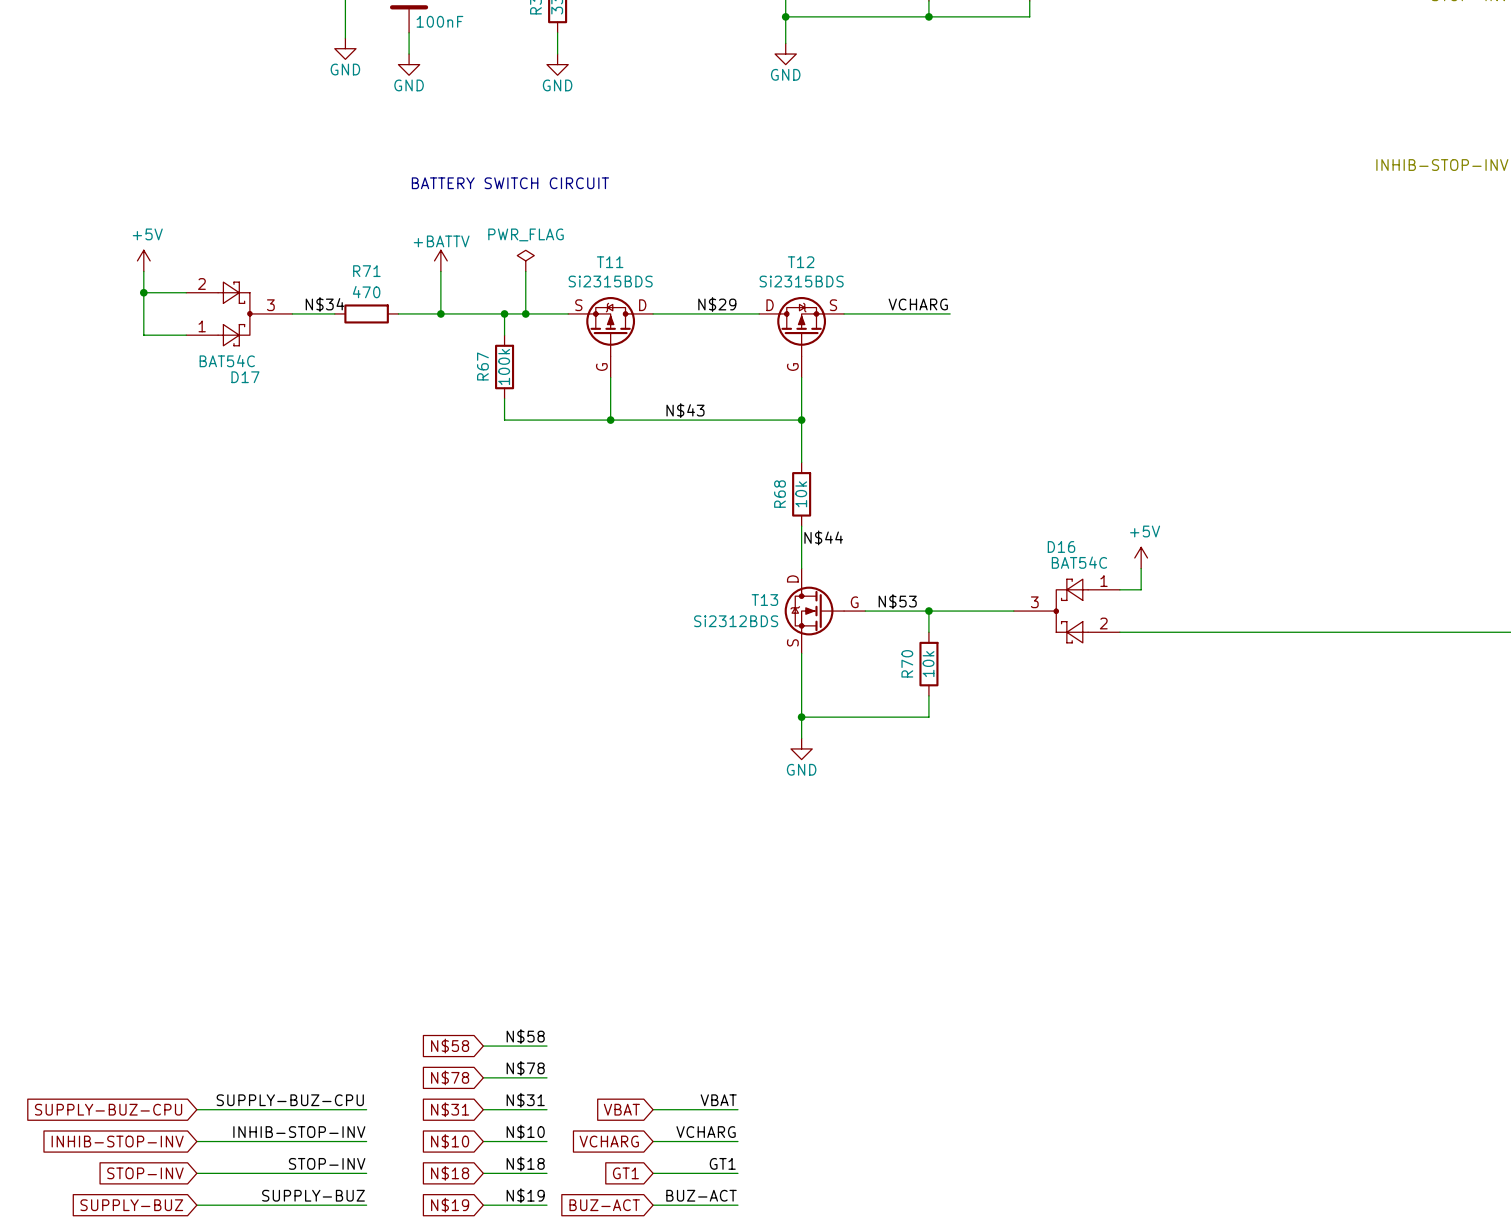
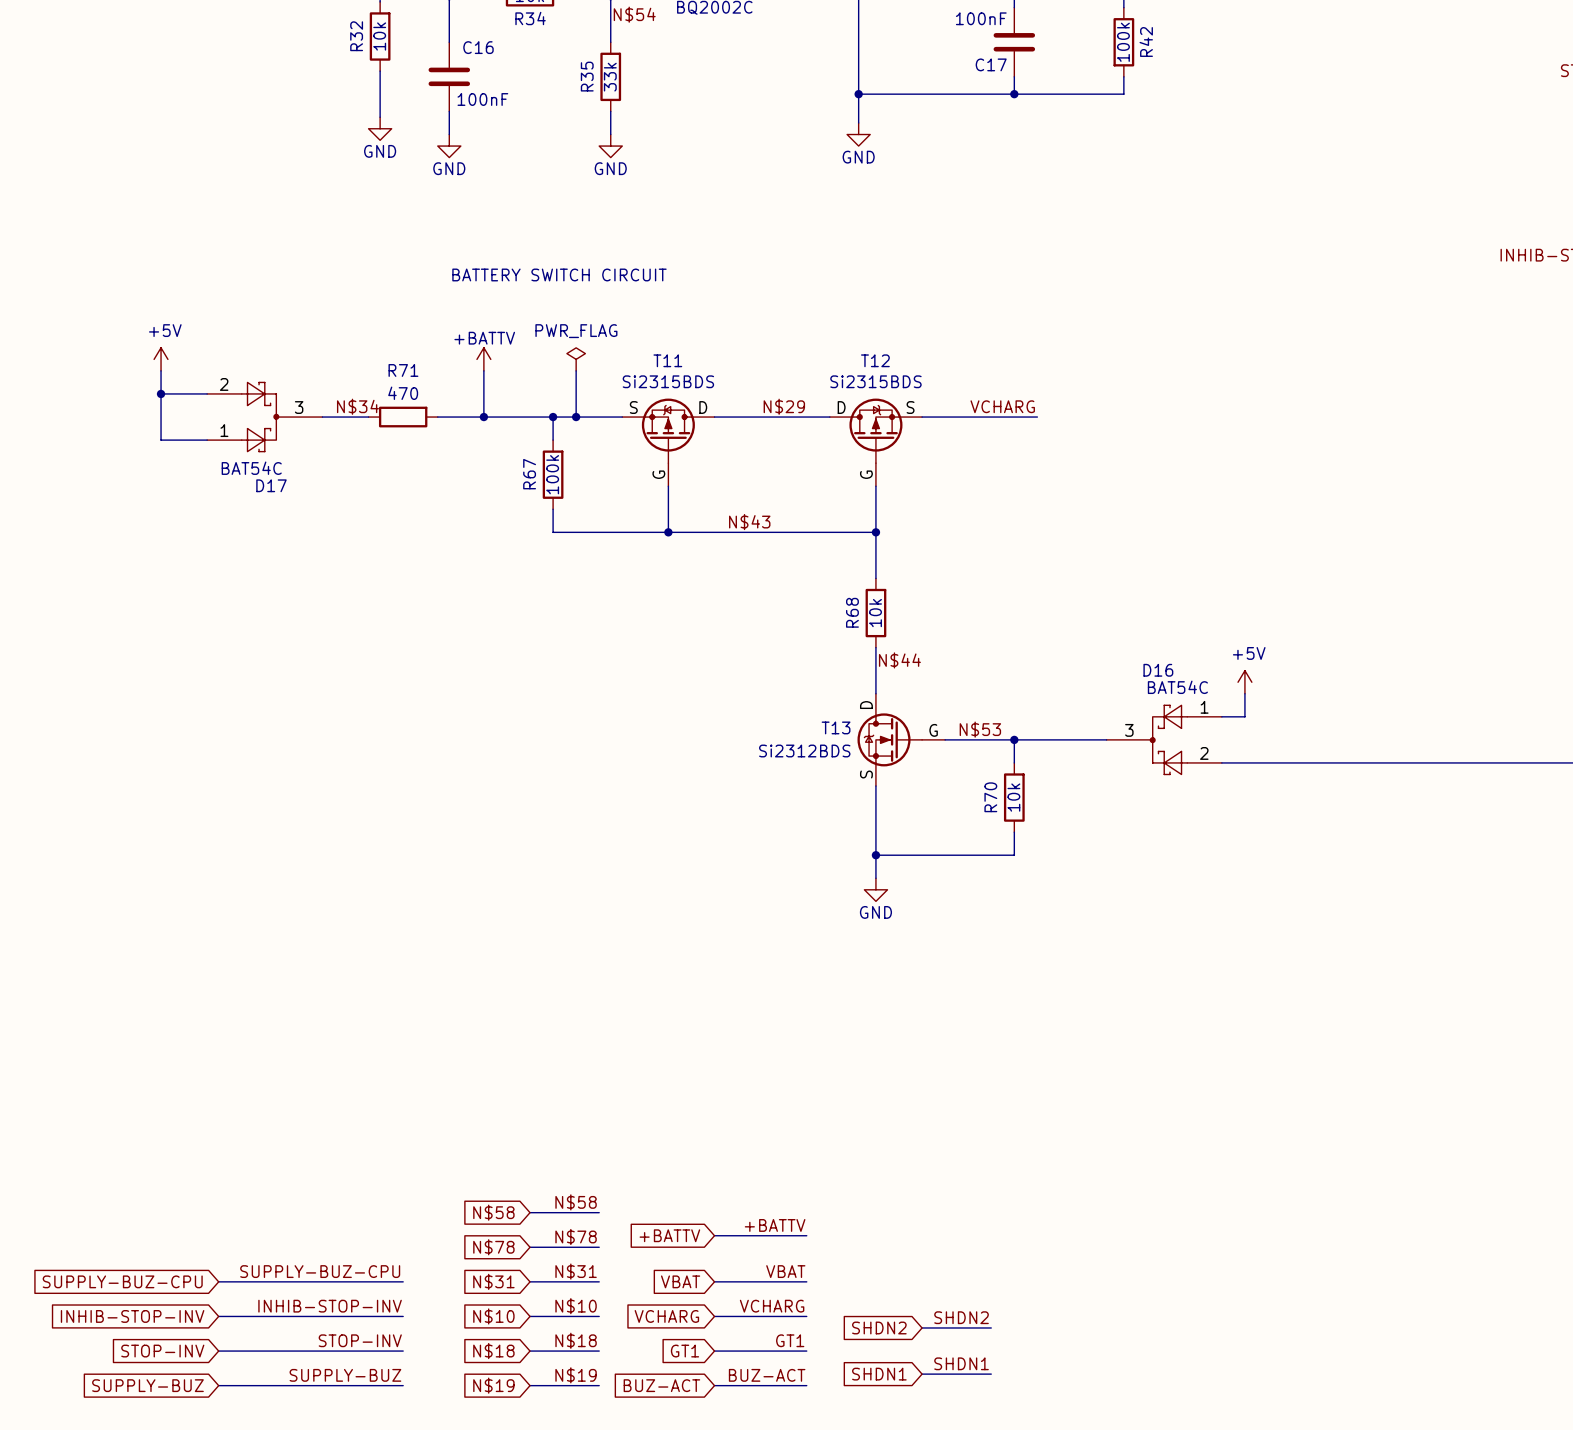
label: none -> +BATTV (775, 1225)
global label: none -> +BATTV (669, 1235)
wire: none -> (714, 1235) (806, 1235)
label: none -> SHDN2 (961, 1317)
global label: none -> SHDN2 (879, 1327)
wire: none -> (922, 1327) (991, 1327)
label: none -> SHDN1 (961, 1363)
global label: none -> SHDN1 (879, 1374)
wire: none -> (922, 1374) (991, 1374)

